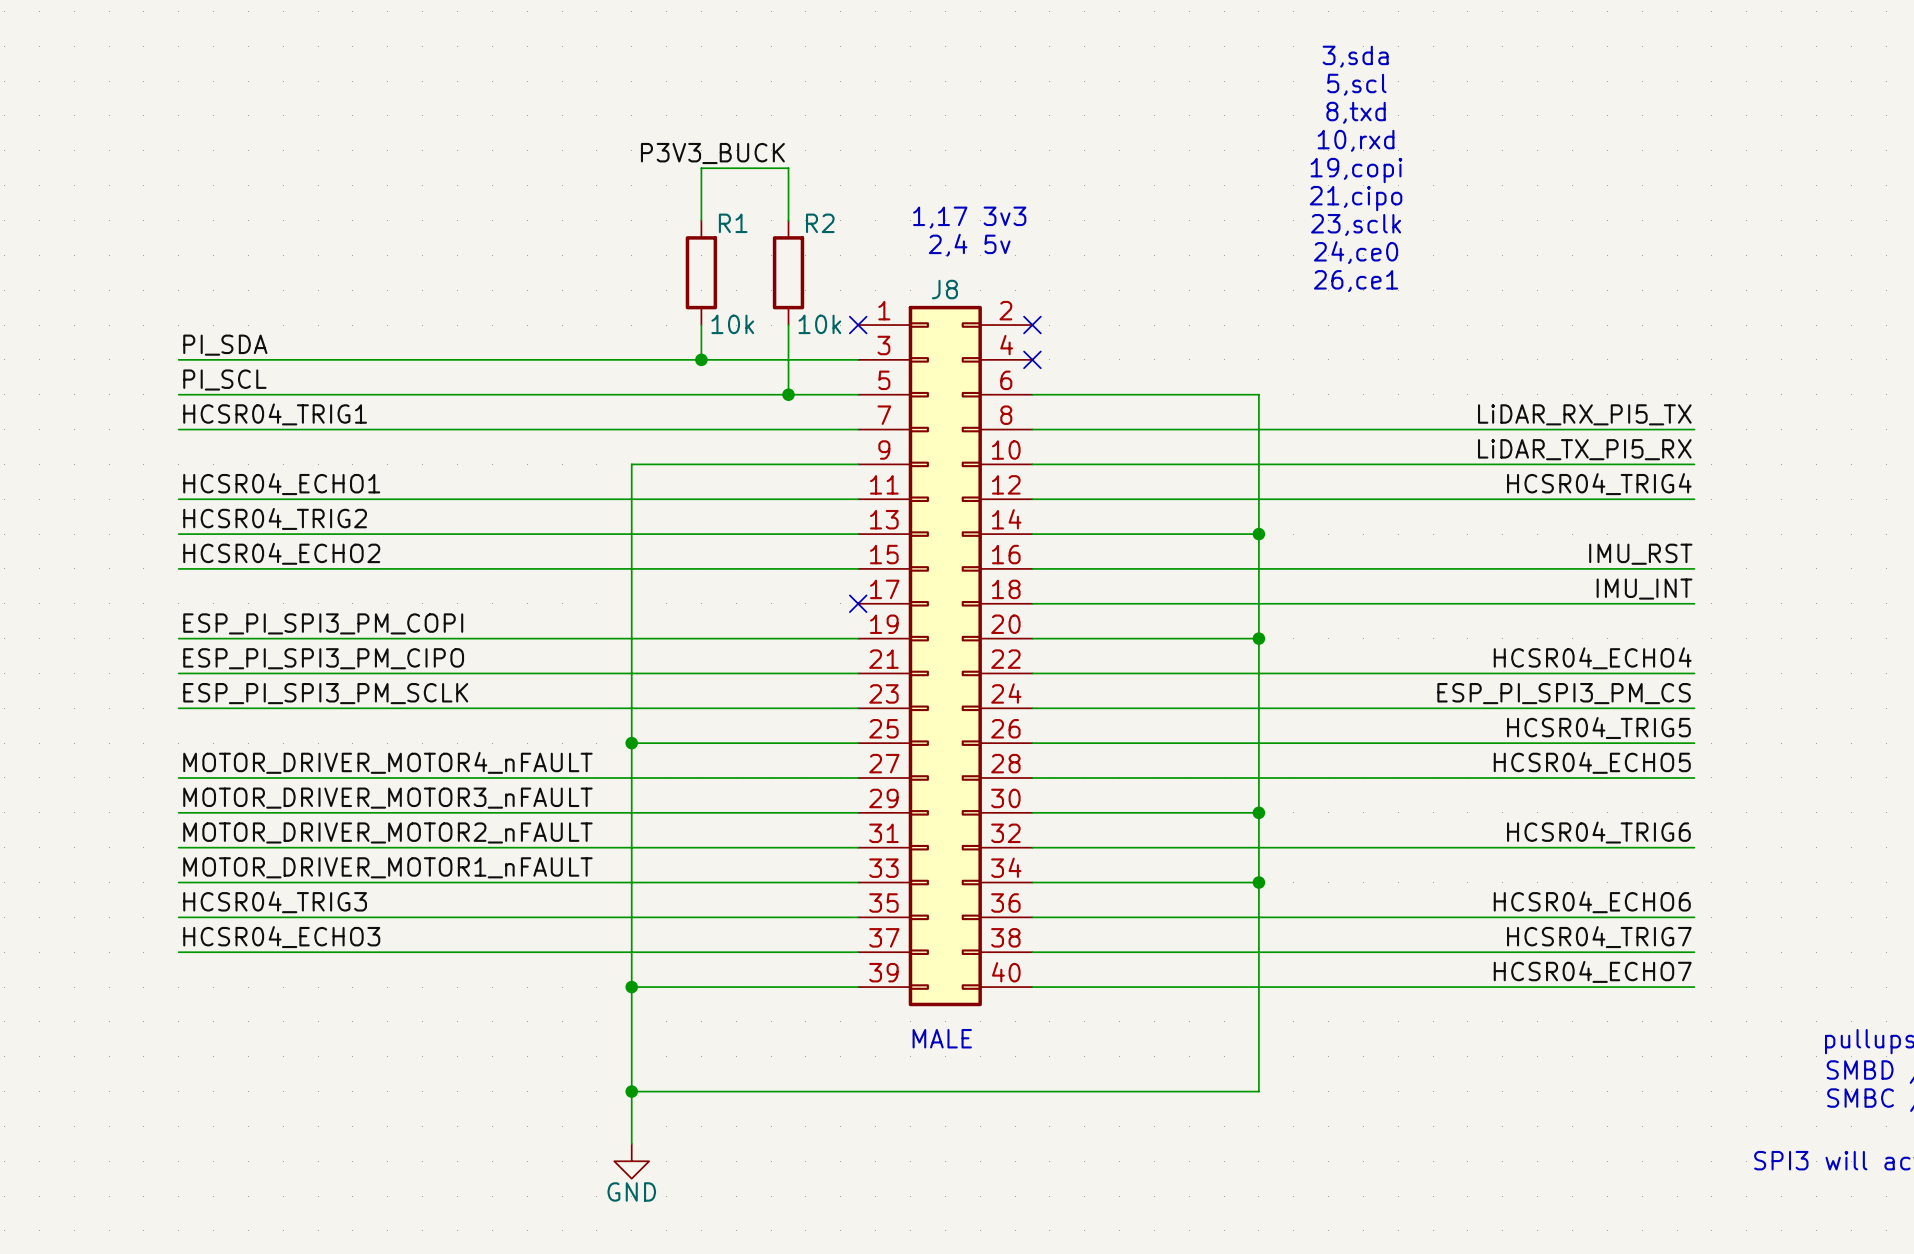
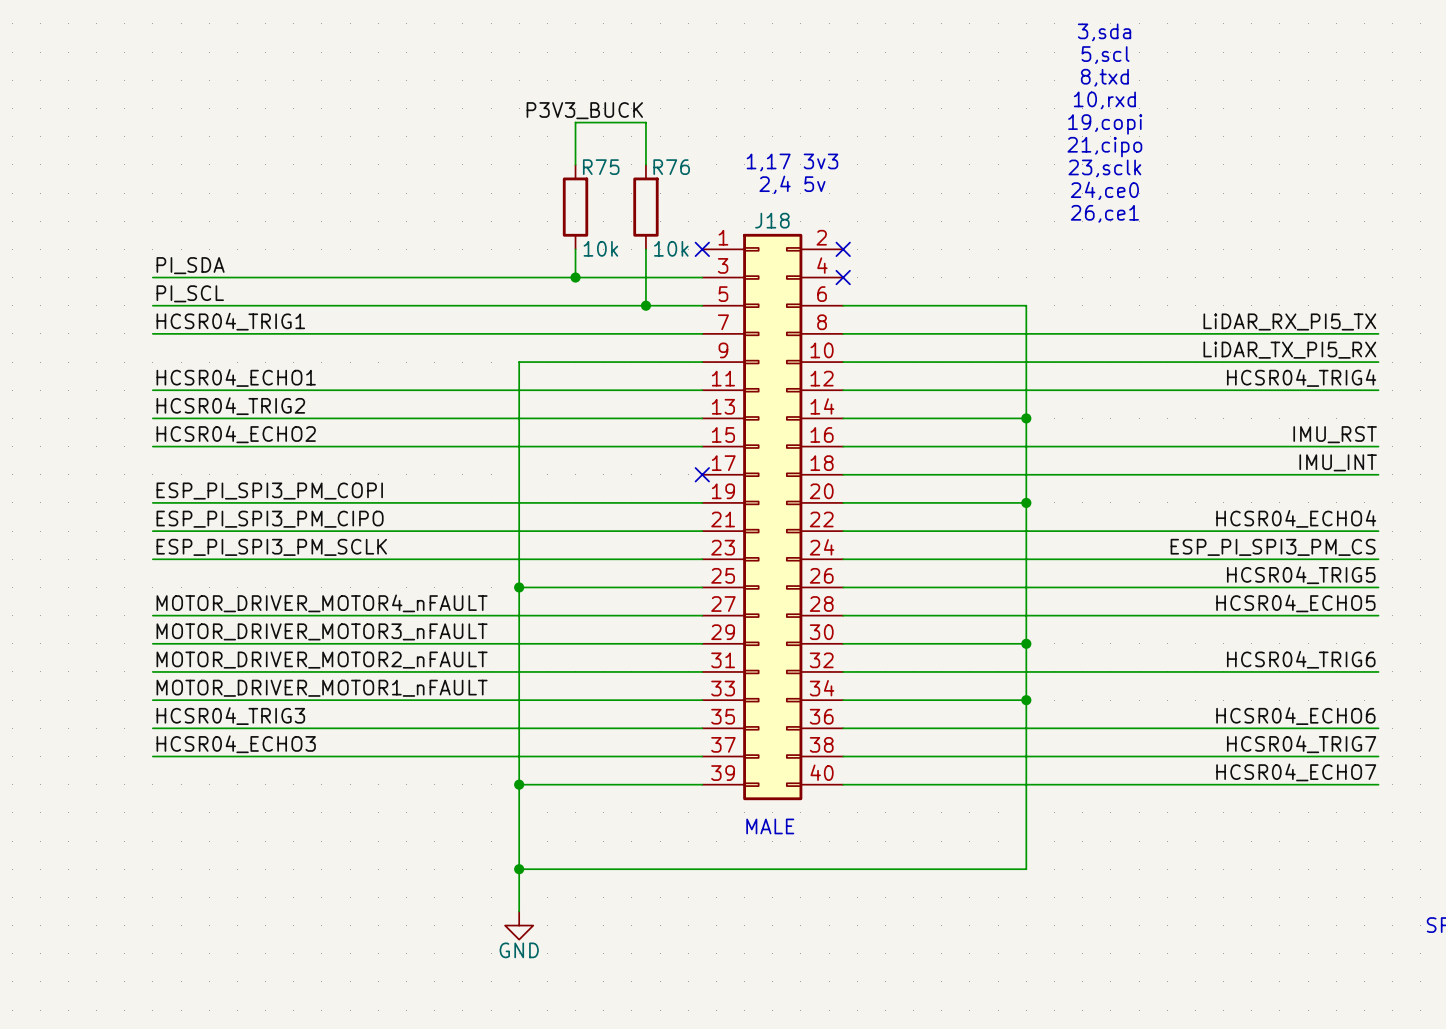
R1 name: R1 (733, 223) -> R75 (601, 167)
R2 name: R2 (820, 223) -> R76 (671, 167)
J8 name: J8 (944, 289) -> J18 (772, 220)

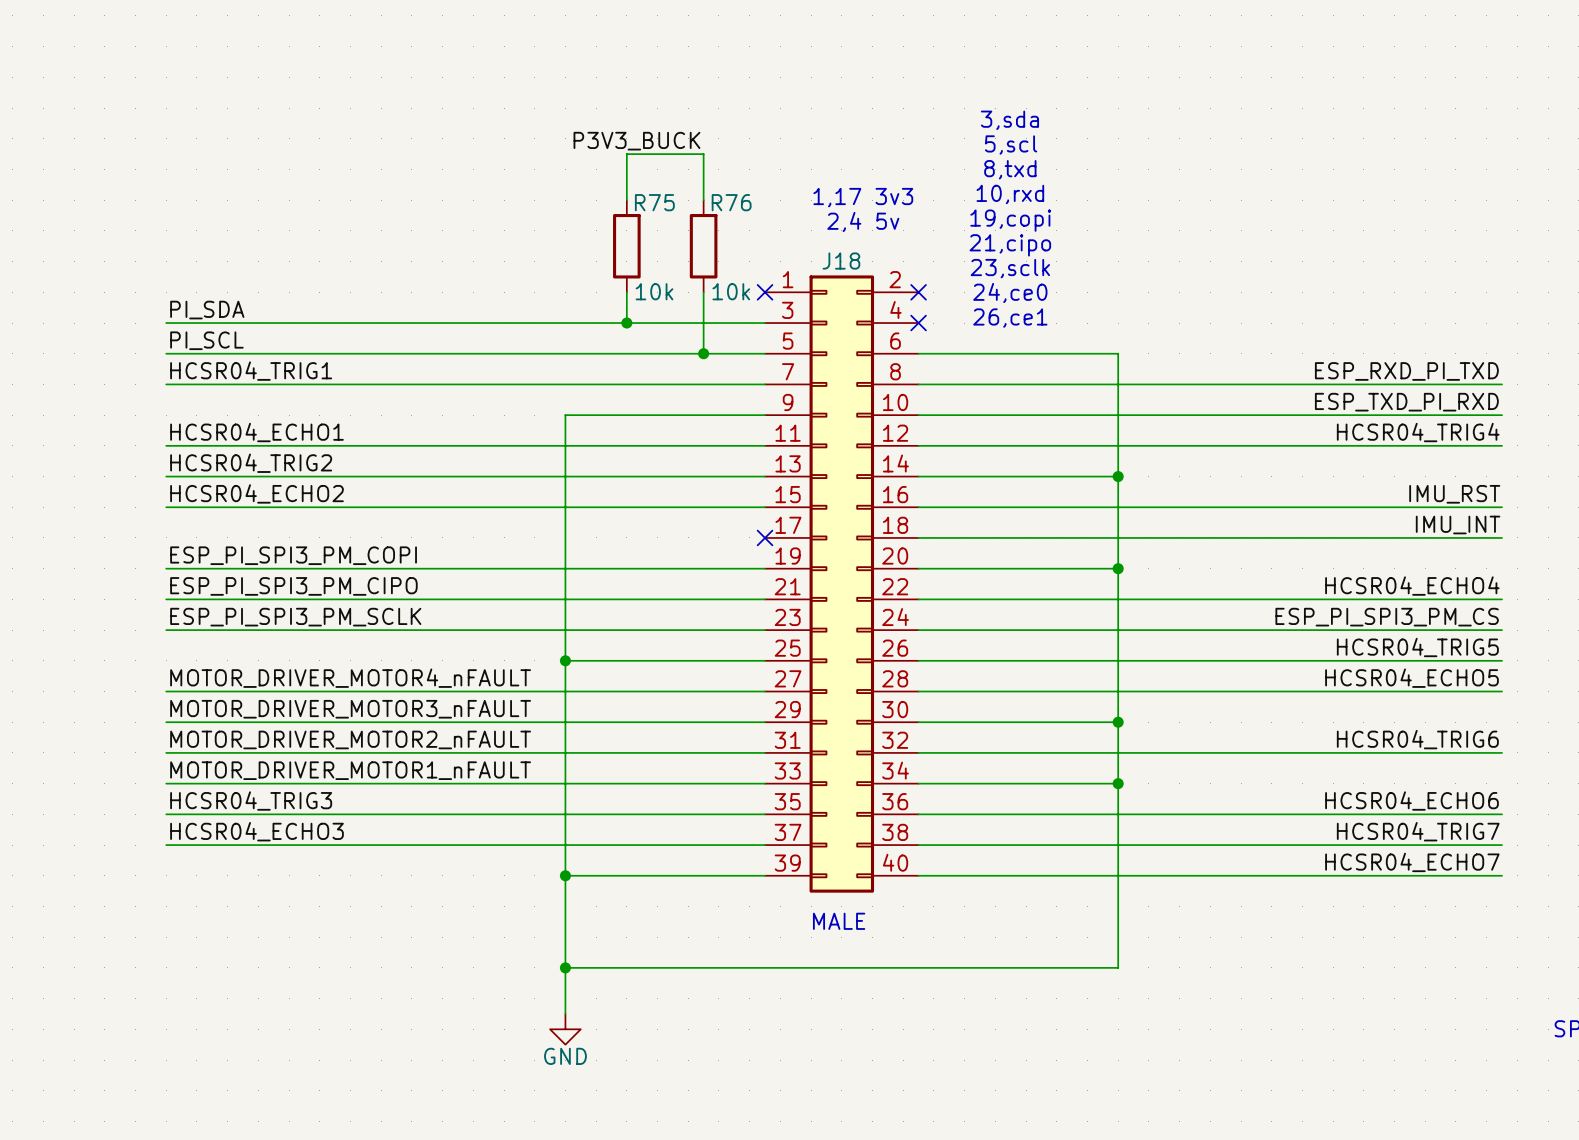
text position: 3,sda (1104, 32) -> 3,sda (1009, 120)
text position: 5,scl (1105, 55) -> 5,scl (1011, 145)
text position: 8,txd (1104, 77) -> 8,txd (1010, 169)
text position: 10,rxd (1104, 100) -> 10,rxd (1010, 194)
text position: 19,copi (1105, 124) -> 19,copi (1010, 220)
text position: 21,cipo (1104, 147) -> 21,cipo (1010, 245)
text position: 23,sclk (1104, 168) -> 23,sclk (1010, 268)
text position: 24,ce0 (1104, 190) -> 24,ce0 (1010, 292)
text position: 26,ce1 (1104, 213) -> 26,ce1 (1010, 318)
label: LiDAR_RX_PI5_TX (1289, 321) -> ESP_RXD_PI_TXD (1406, 371)
label: LiDAR_TX_PI5_RX (1289, 350) -> ESP_TXD_PI_RXD (1406, 402)

